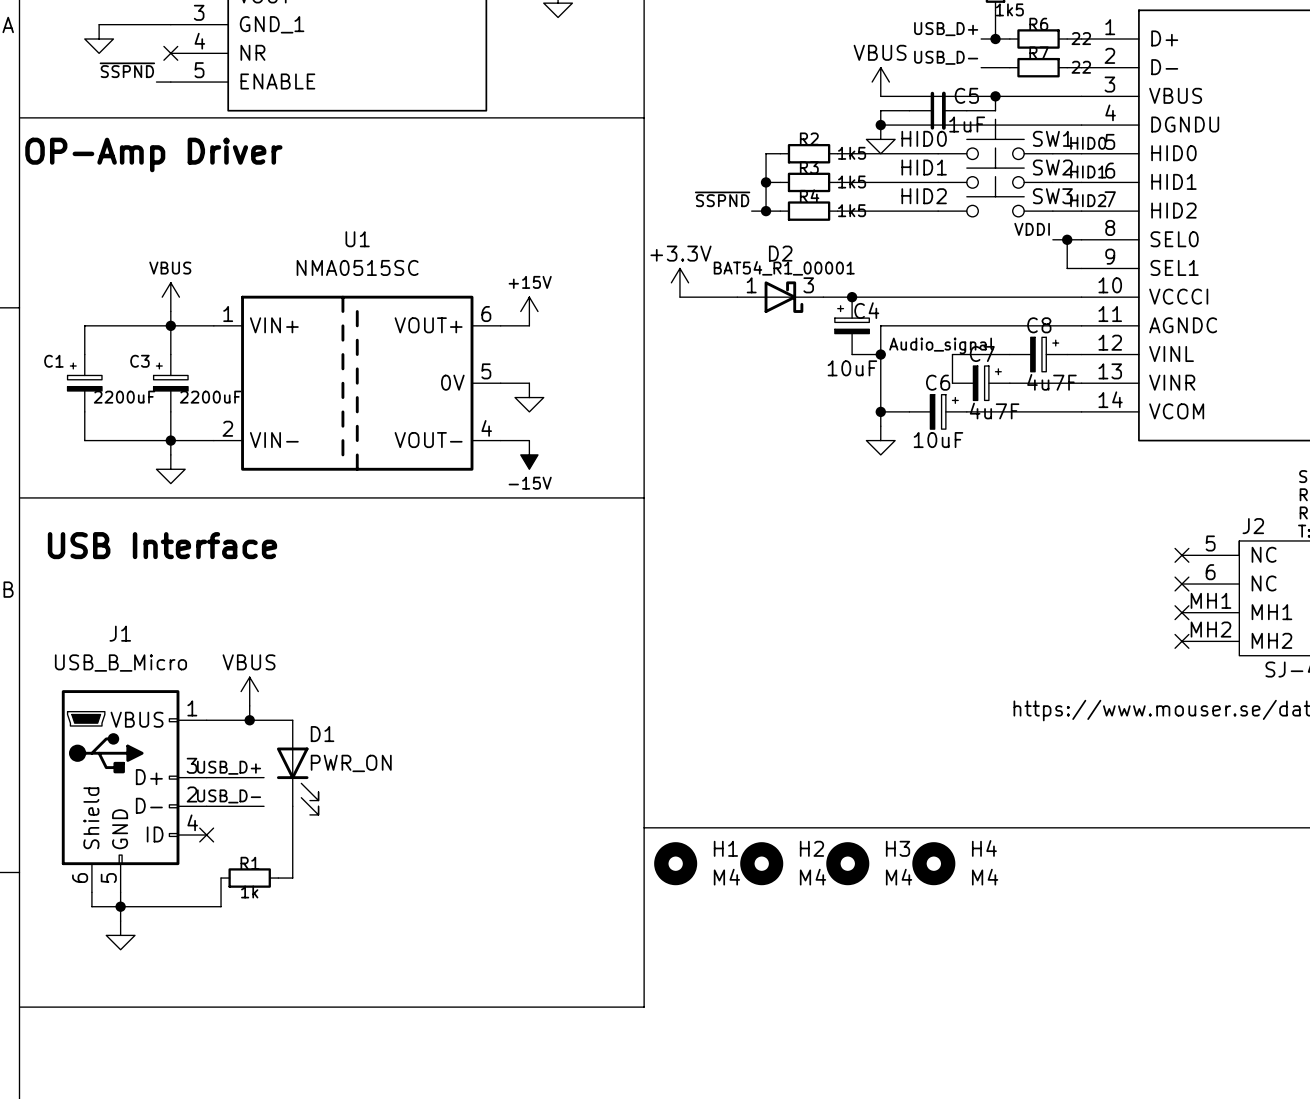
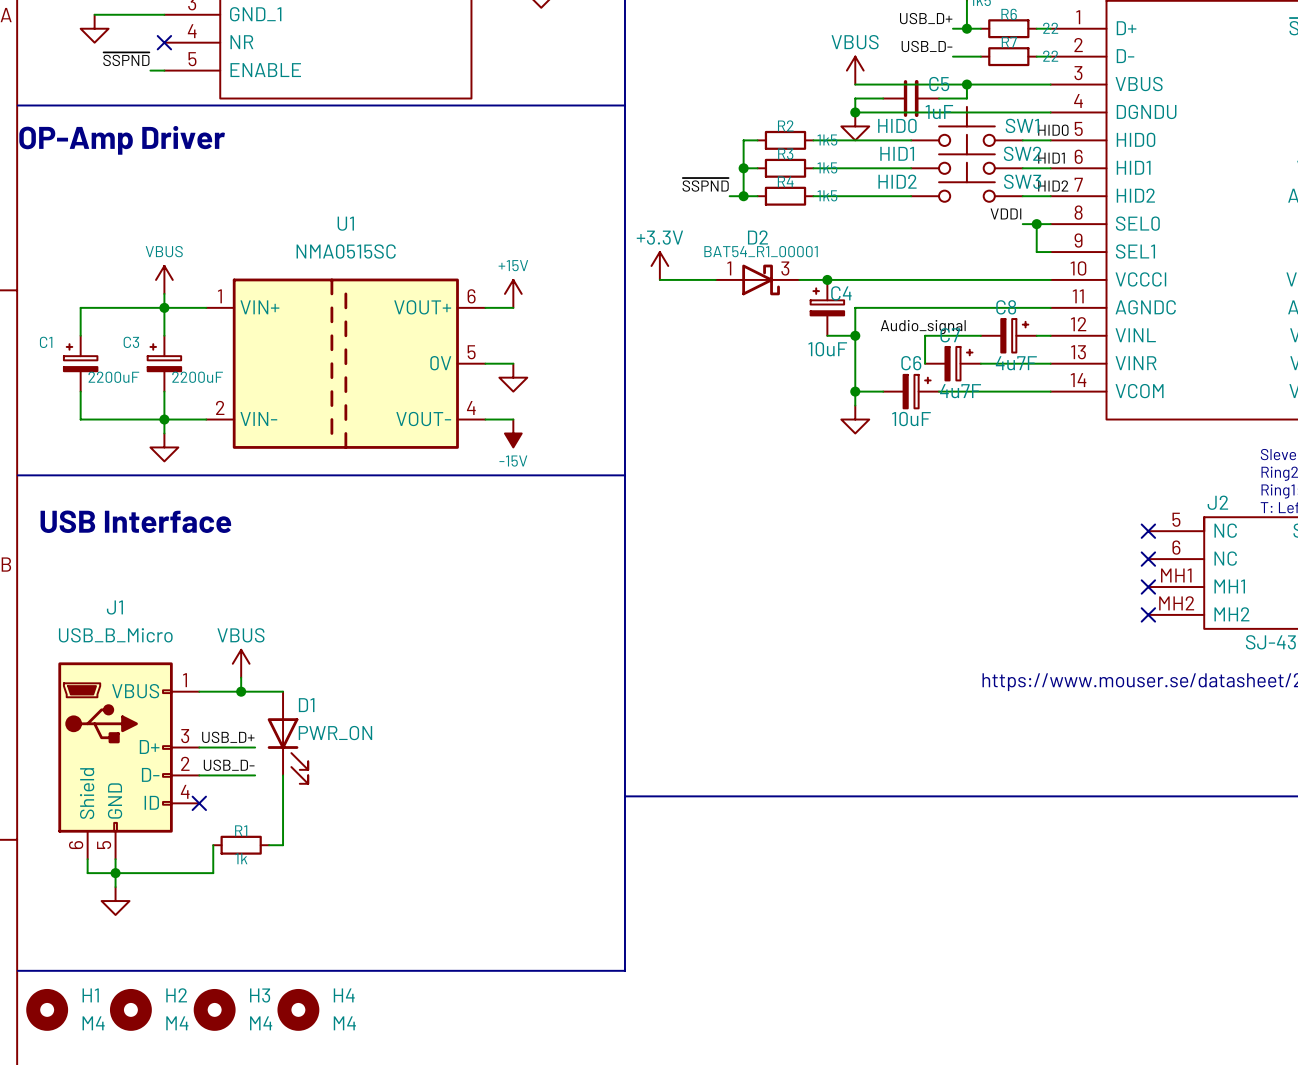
H1 position: (675, 863) -> (47, 1009)
H2 position: (761, 863) -> (130, 1009)
H3 position: (847, 863) -> (214, 1009)
H4 position: (933, 863) -> (298, 1009)

